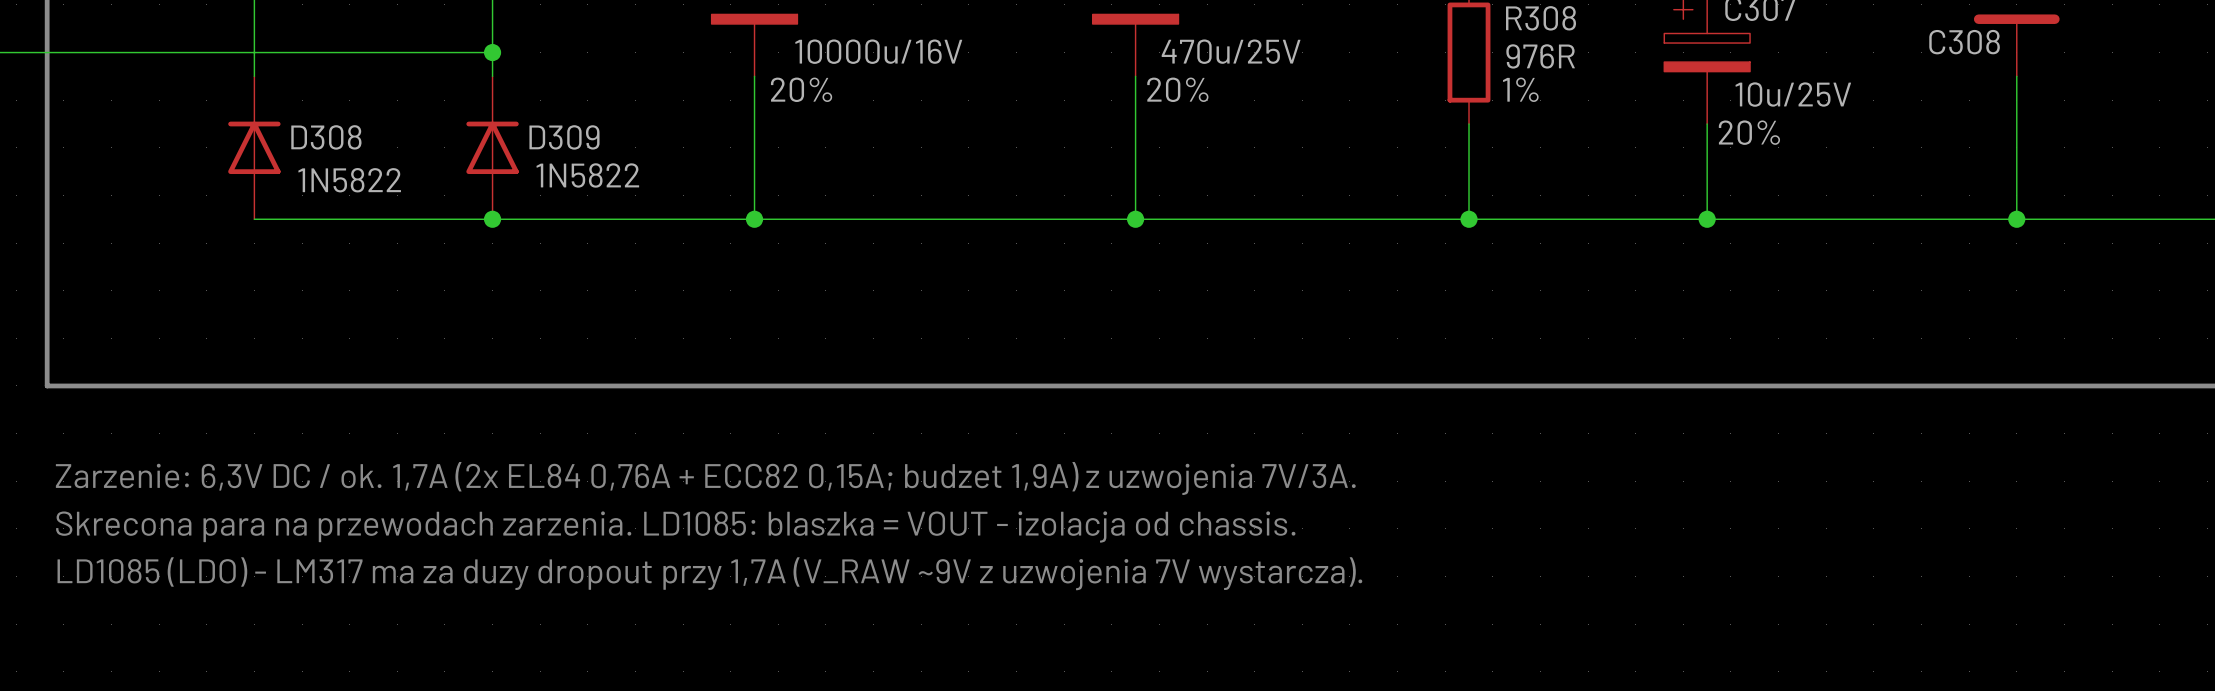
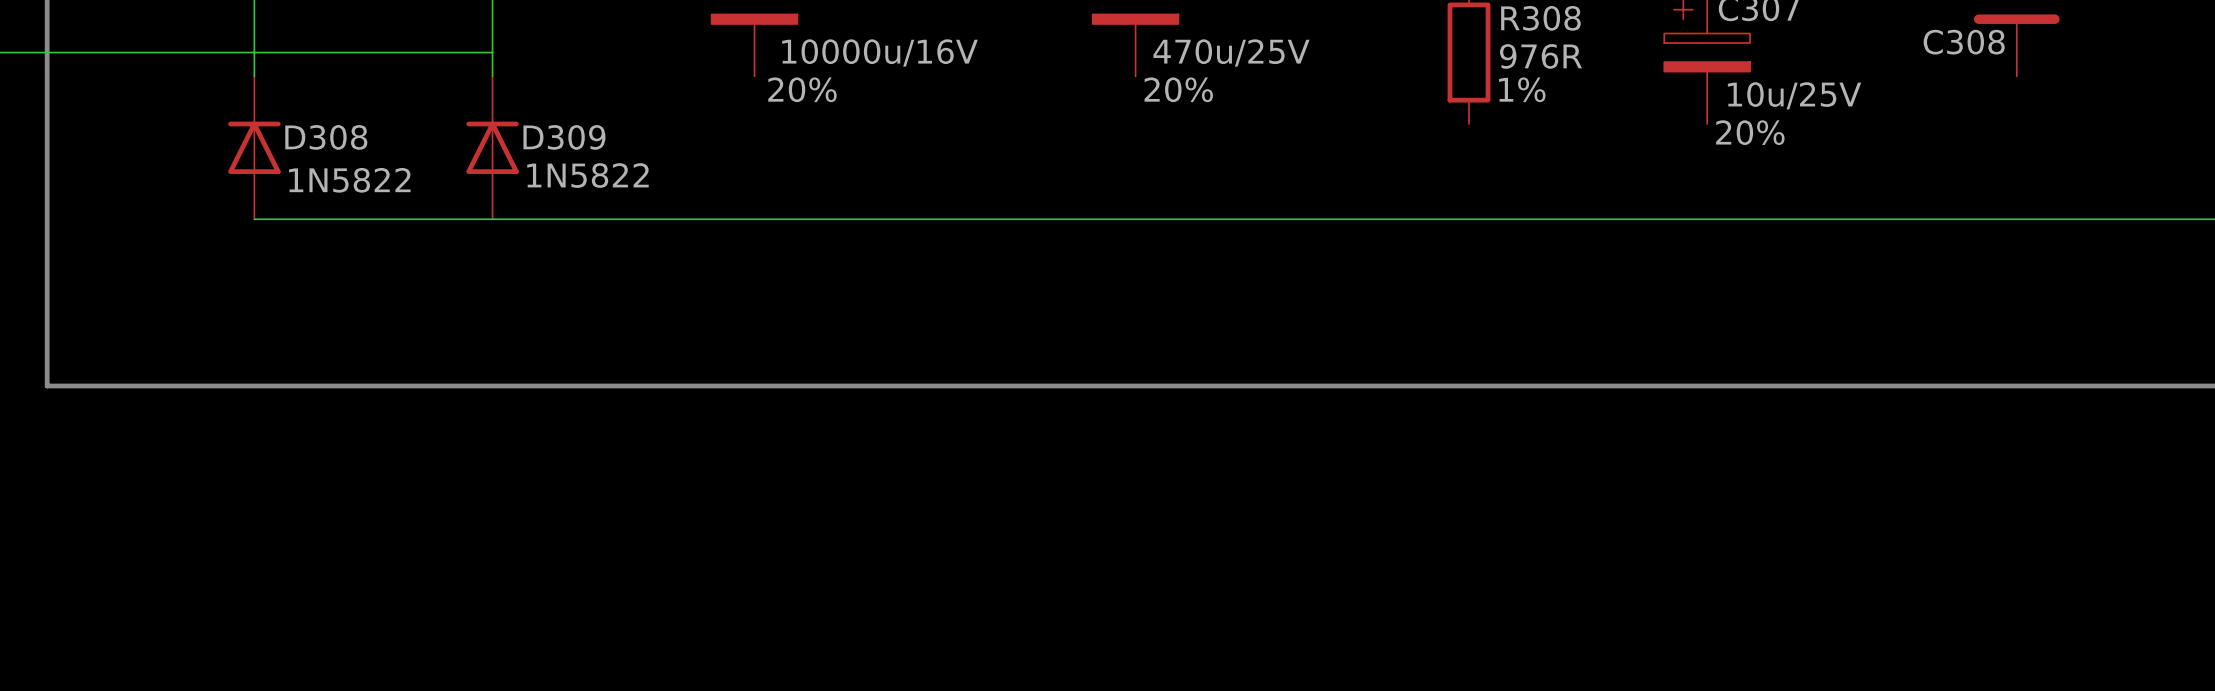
junction: (492, 52) -> none
wire: (754, 76) (754, 219) -> none
wire: (1135, 76) (1135, 219) -> none
wire: (2016, 76) (2016, 219) -> none
wire: (1469, 124) (1469, 219) -> none
wire: (1707, 124) (1707, 219) -> none
junction: (492, 219) -> none
junction: (754, 219) -> none
junction: (1135, 219) -> none
junction: (1469, 219) -> none
junction: (1707, 219) -> none
junction: (2016, 219) -> none
text: Zarzenie: 6,3V DC / ok. 1,7A (2x EL84 0,76A + ECC82 0,15A; budzet 1,9A) z uzwojenia 7V/3A. (705, 478) -> none
text: Skrecona para na przewodach zarzenia. LD1085: blaszka = VOUT - izolacja od chassis. (675, 527) -> none
text: LD1085 (LDO) - LM317 ma za duzy dropout przy 1,7A (V_RAW ~9V z uzwojenia 7V wystarcza). (709, 573) -> none

